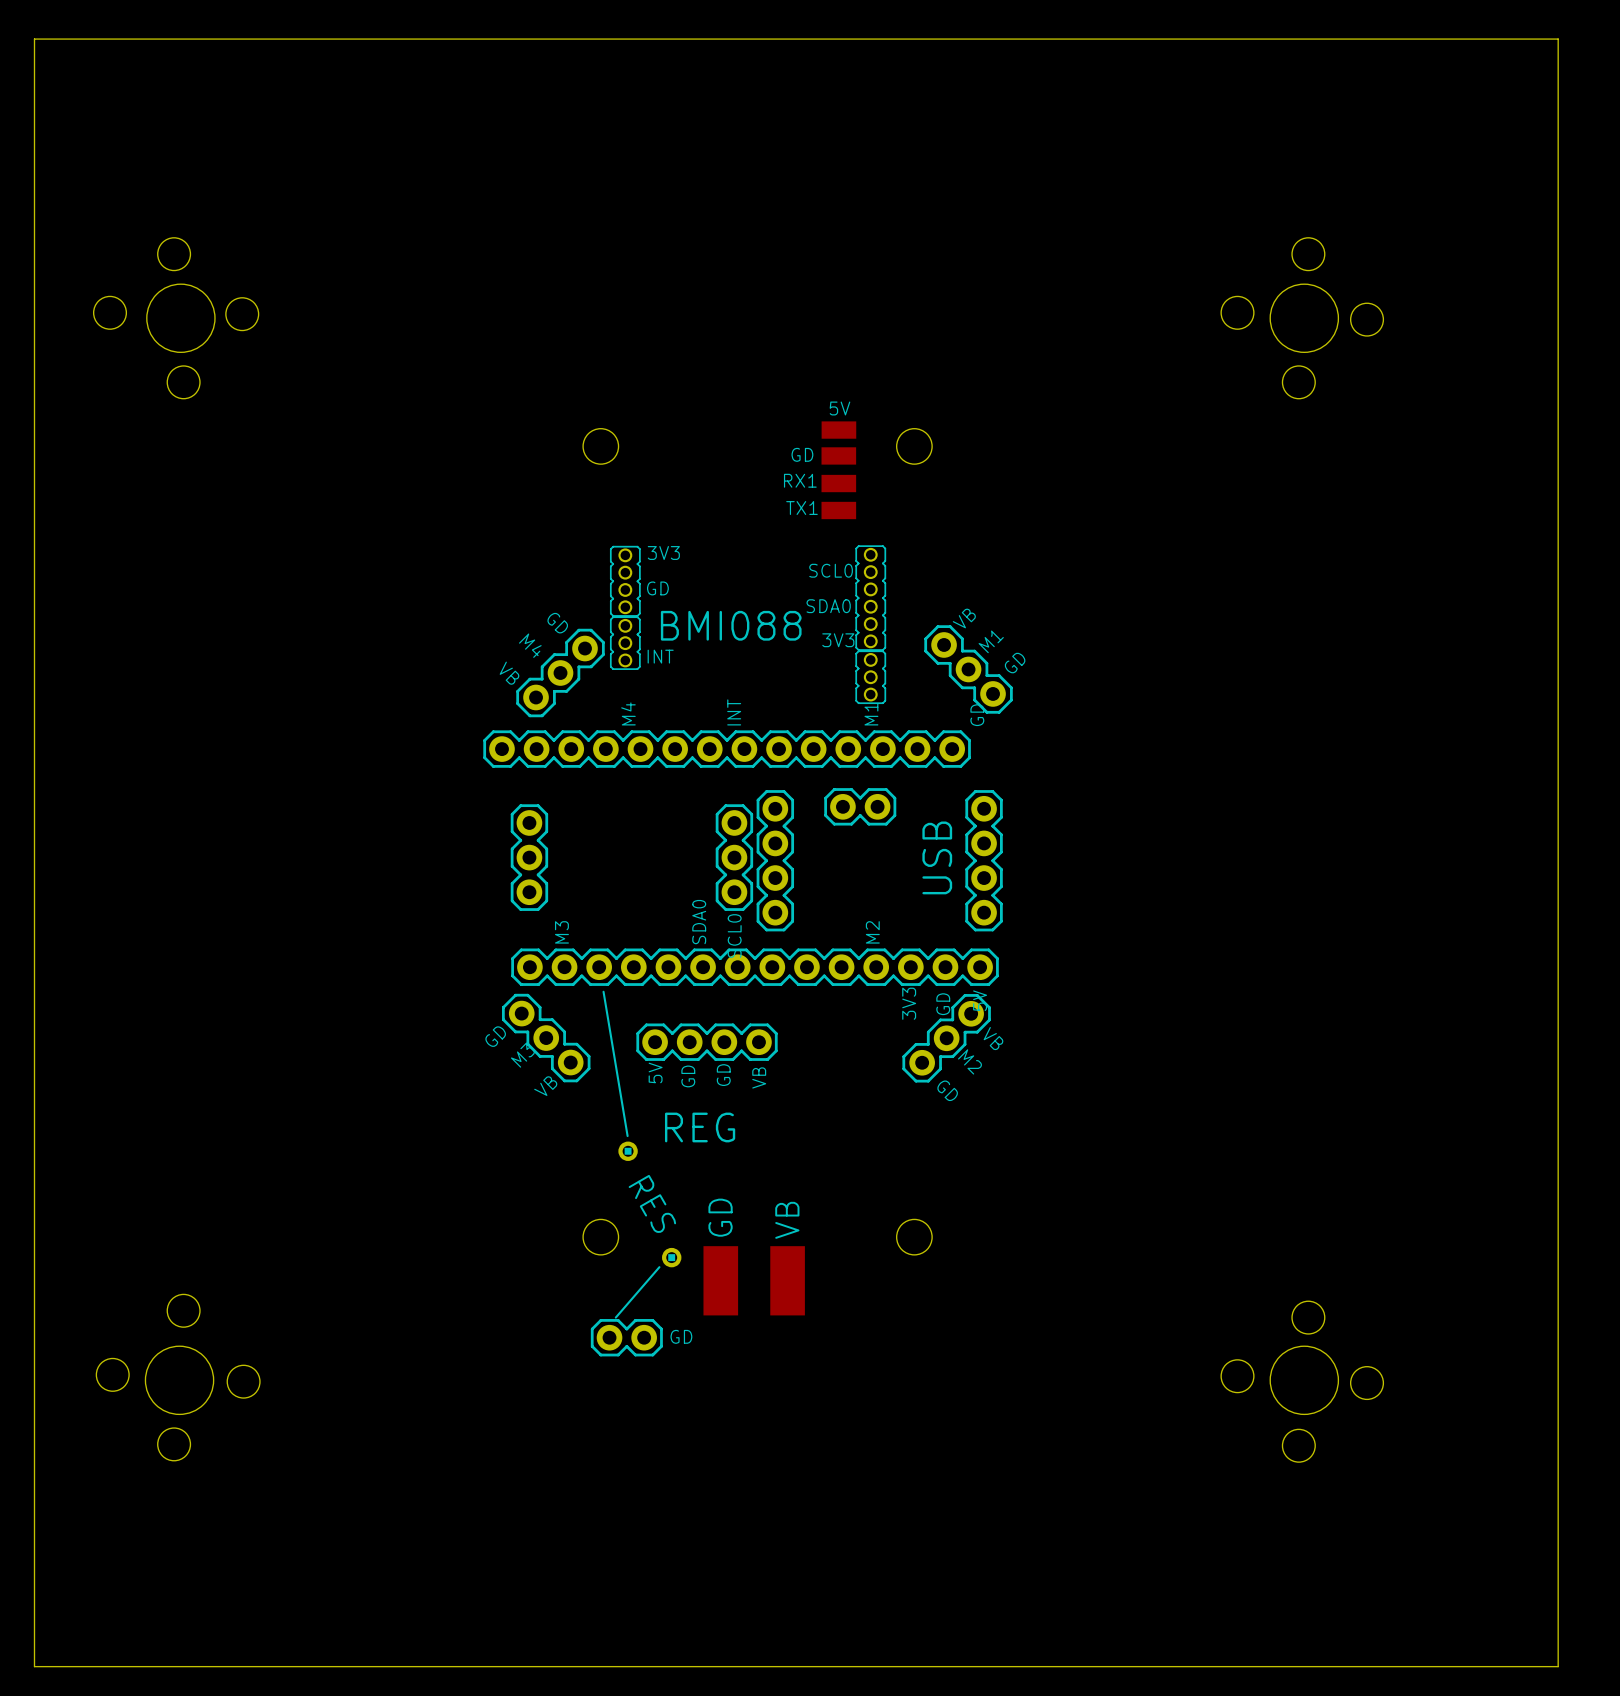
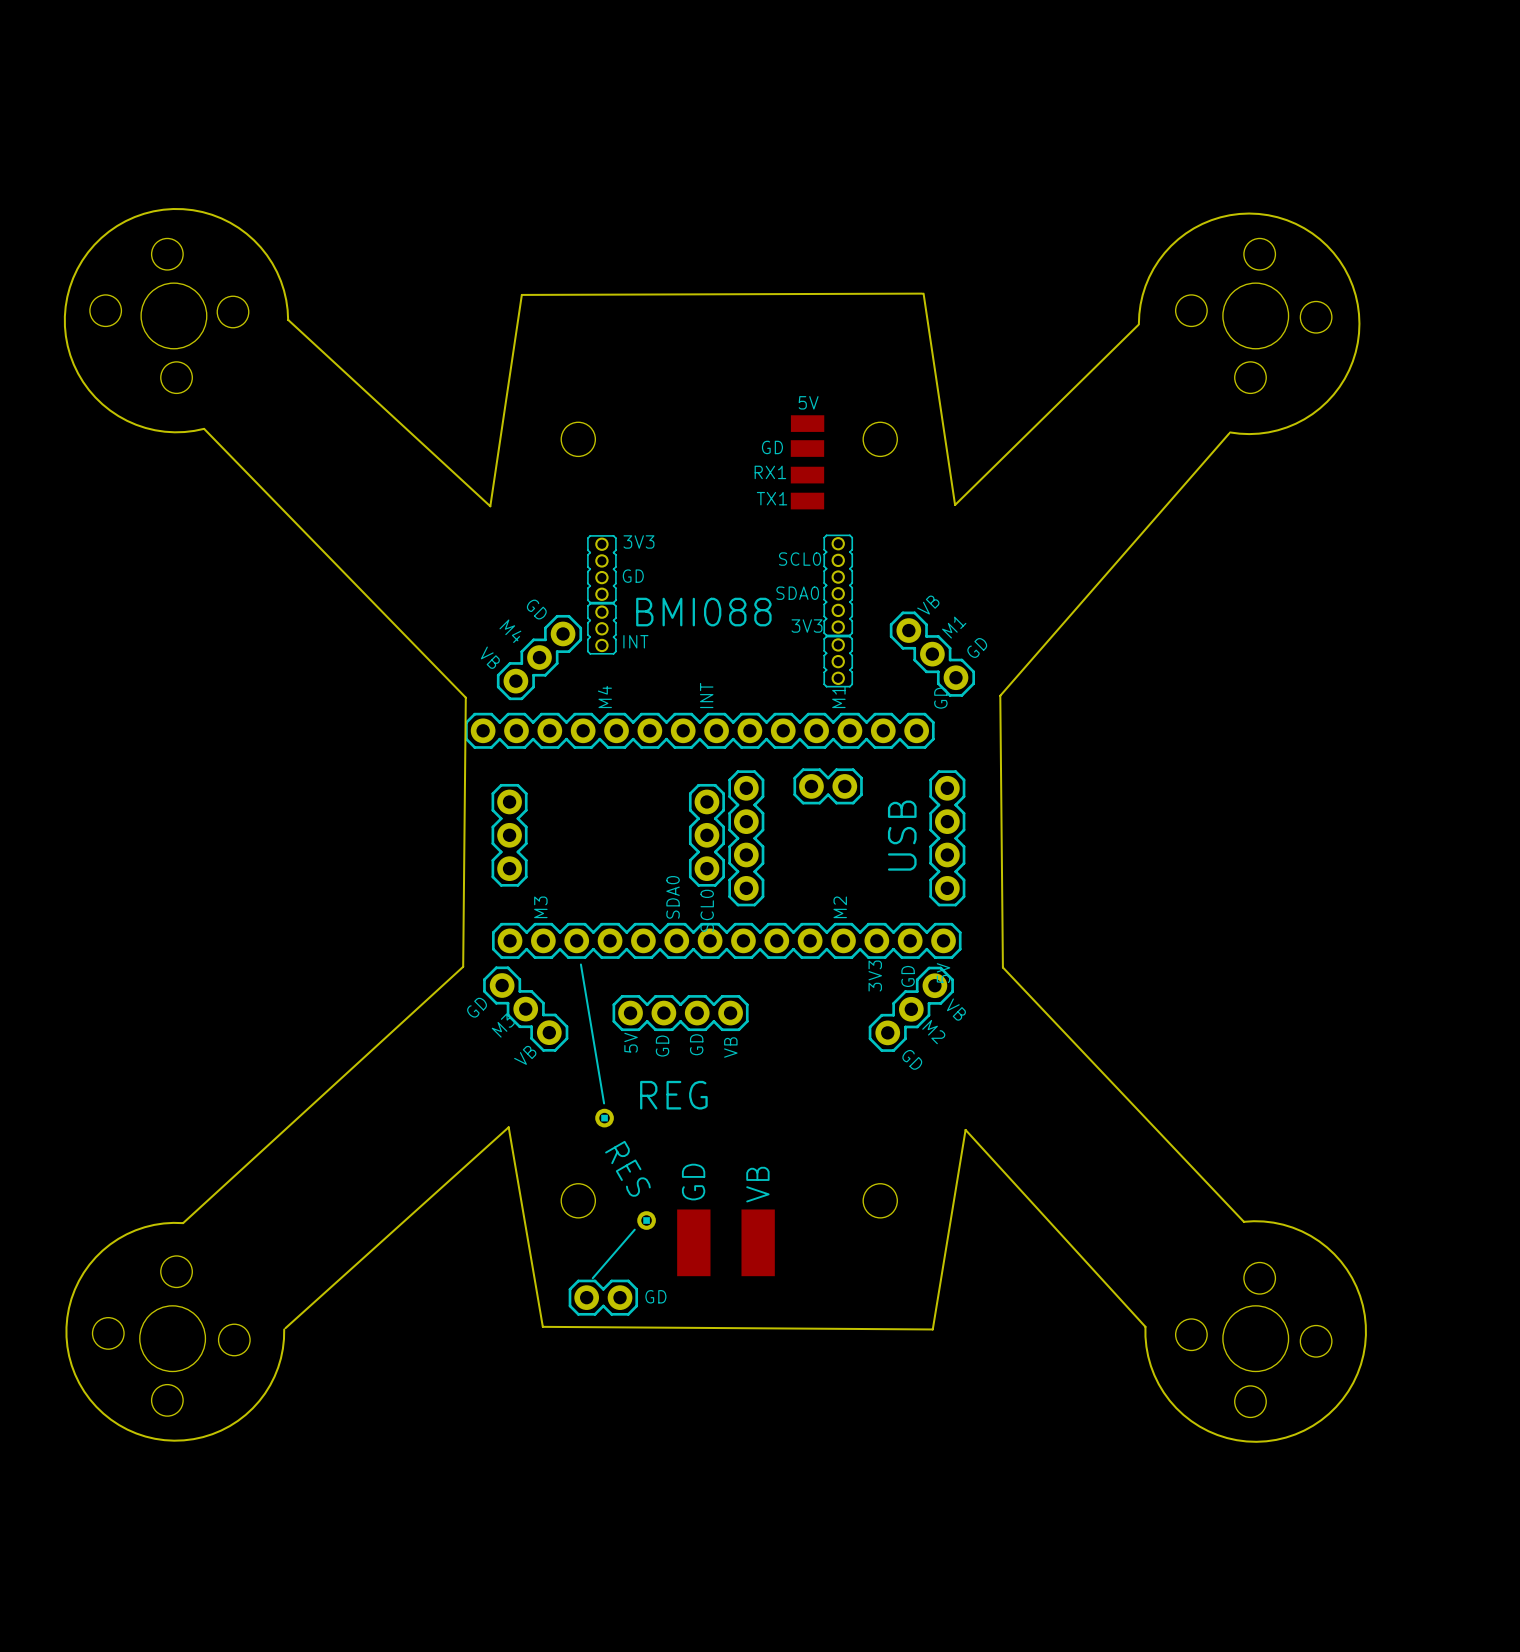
board edge: (34, 39) (1558, 39) (1558, 1666) (34, 1666) (34, 39) -> none
board edge: none -> (922, 293) (521, 294) (490, 506) (288, 319) (284, 290) (272, 263) (254, 240) (230, 222) (202, 212) (183, 209) (163, 209) (144, 213) (125, 221) (109, 231) (94, 244) (82, 260) (73, 278) (67, 296) (64, 316) (65, 336) (73, 364) (83, 382) (95, 397) (118, 416) (145, 427) (174, 432) (204, 428) (465, 697) (463, 966) (183, 1223) (163, 1223) (144, 1227) (118, 1238) (102, 1250) (89, 1264) (74, 1289) (68, 1308) (66, 1337) (69, 1356) (75, 1374) (90, 1399) (103, 1413) (118, 1424) (136, 1433) (154, 1438) (174, 1440) (193, 1439) (212, 1434) (229, 1426) (252, 1408) (265, 1393) (274, 1376) (282, 1348) (284, 1329)
board edge: none -> (923, 293) (955, 504) (1138, 324)
board edge: none -> (1138, 323) (1140, 304) (1145, 286) (1158, 260) (1171, 245) (1185, 233) (1211, 220) (1239, 213) (1258, 213) (1277, 217) (1304, 228) (1320, 239) (1333, 252) (1349, 277) (1355, 295) (1359, 314) (1359, 333) (1355, 352) (1344, 378) (1333, 394) (1320, 408) (1295, 423) (1268, 432) (1249, 434) (1230, 432)
board edge: none -> (1229, 433) (1000, 695) (1002, 967) (1243, 1221) (1273, 1222) (1302, 1231) (1327, 1247) (1346, 1269) (1356, 1286) (1362, 1305) (1365, 1325) (1365, 1345) (1360, 1364) (1353, 1382) (1342, 1399) (1329, 1413) (1313, 1425) (1295, 1434) (1266, 1441) (1246, 1441) (1227, 1438) (1208, 1431) (1191, 1421) (1169, 1400) (1158, 1384) (1148, 1356) (1145, 1326) (965, 1129) (932, 1329) (542, 1326) (508, 1127) (285, 1328)

